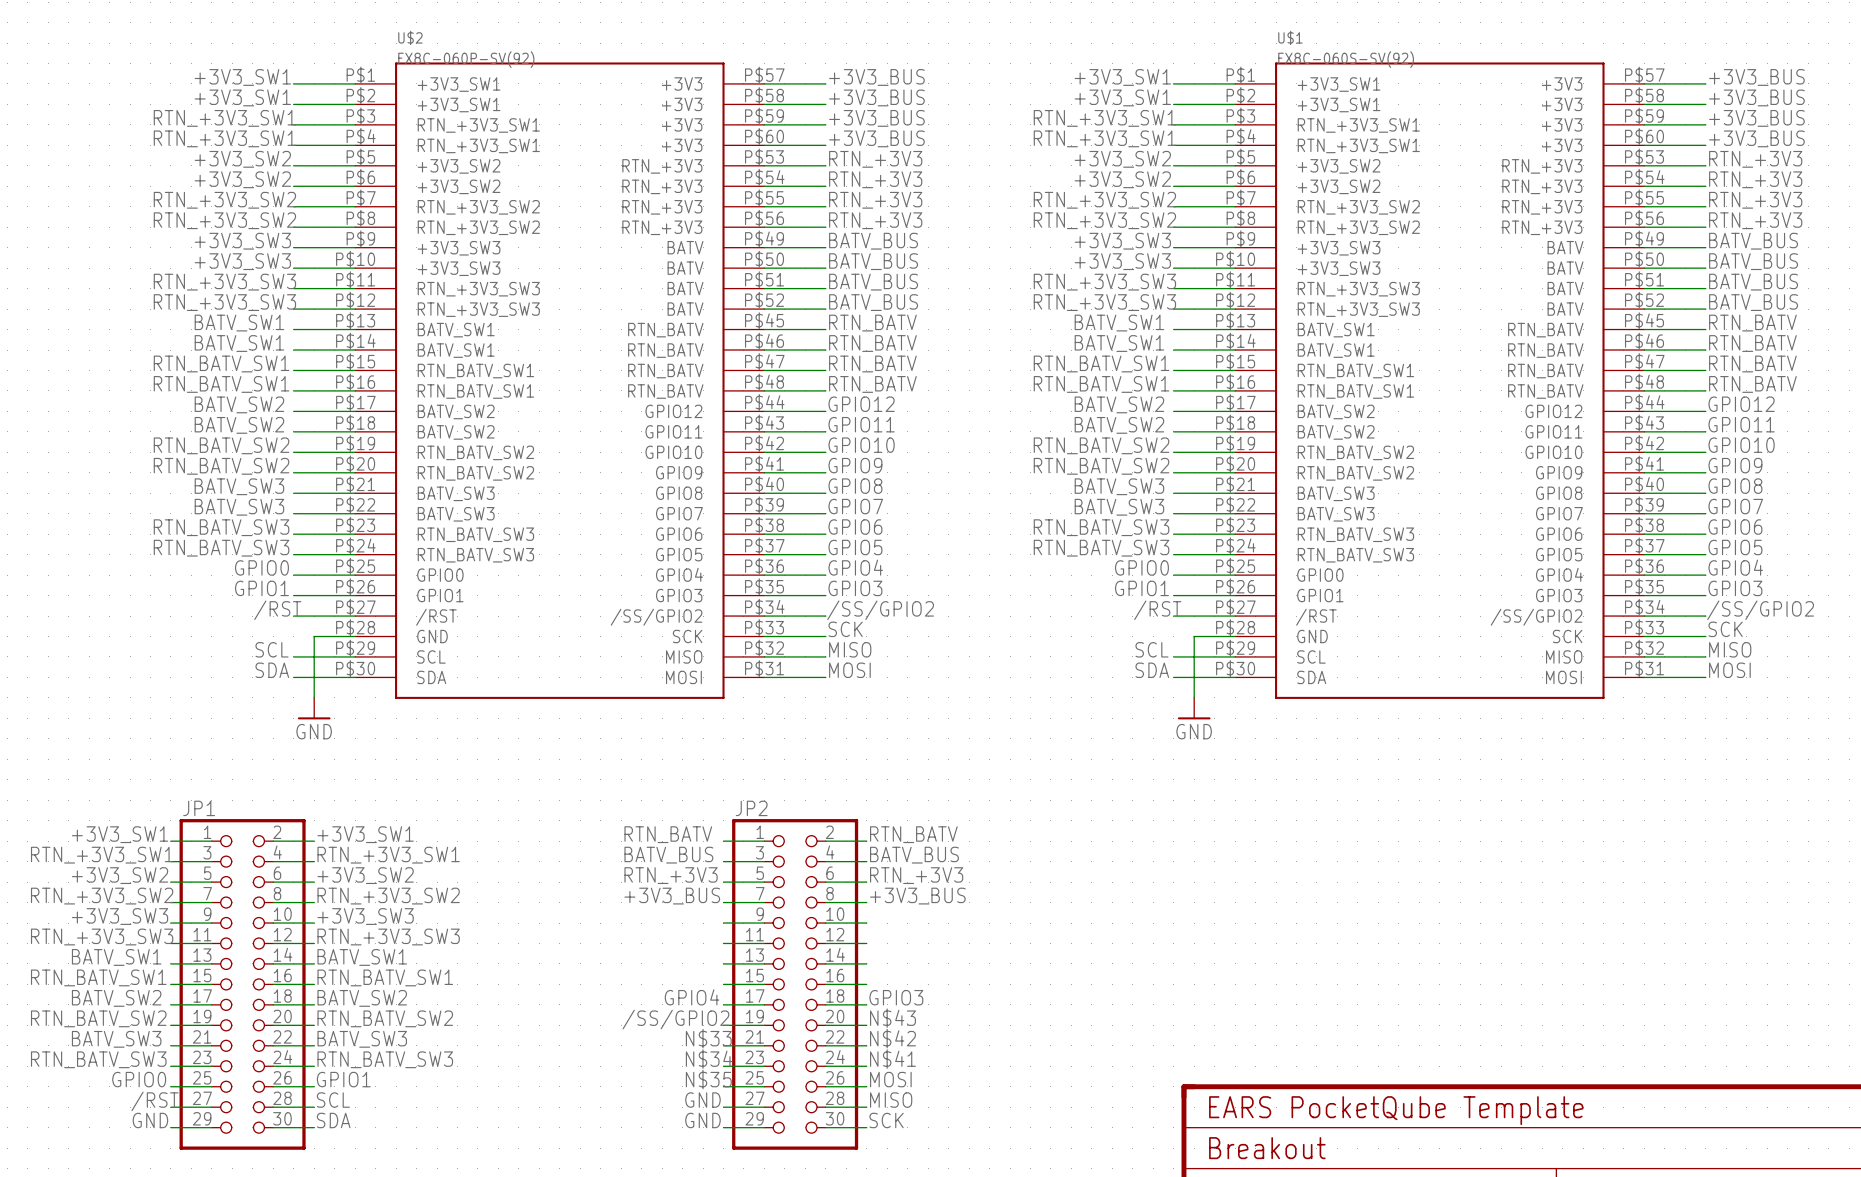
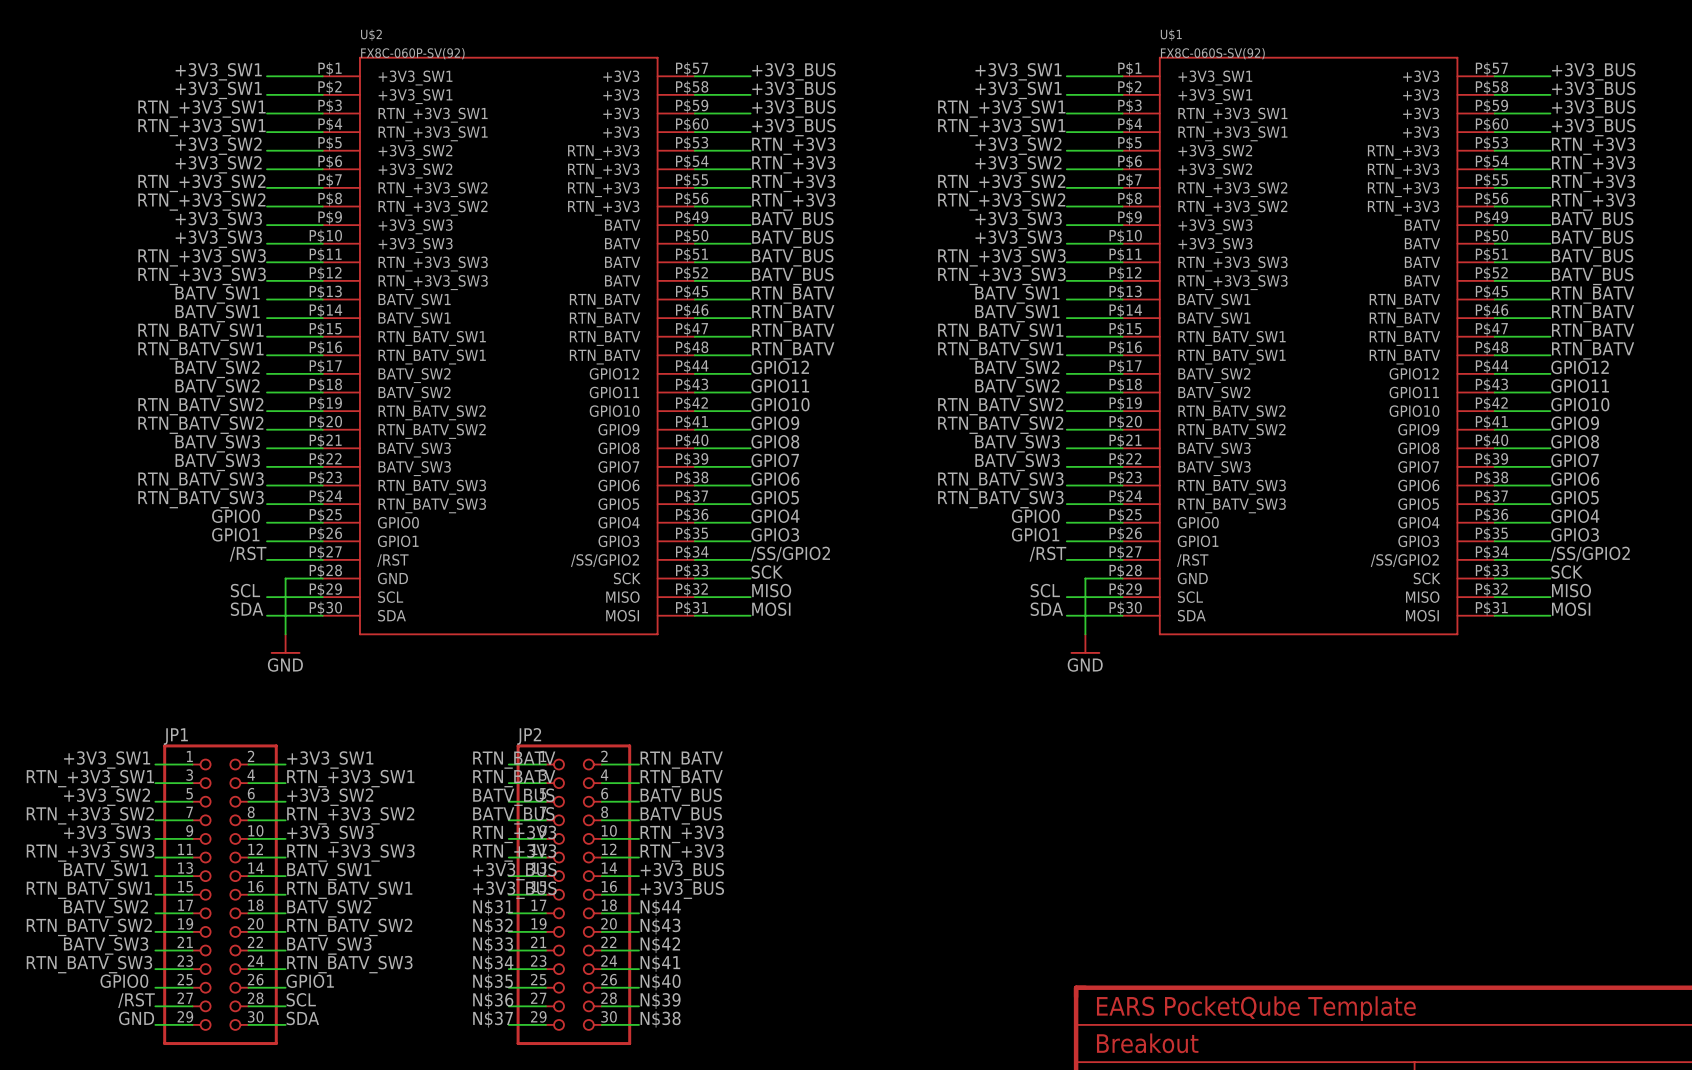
label: none -> RTN_BATV (514, 760)
label: RTN_BATV (668, 834) -> none
label: none -> RTN_BATV (681, 760)
label: RTN_BATV (913, 834) -> none
wire: (723, 841) (764, 841) -> (508, 764) (545, 764)
wire: (825, 841) (866, 841) -> (601, 764) (638, 764)
label: none -> RTN_BATV (514, 778)
label: BATV_BUS (668, 855) -> none
label: none -> RTN_BATV (681, 778)
label: BATV_BUS (914, 855) -> none
wire: (723, 861) (764, 861) -> (508, 783) (545, 783)
wire: (825, 861) (866, 861) -> (601, 783) (638, 783)
label: none -> BATV_BUS (513, 797)
label: RTN_+3V3 (671, 875) -> none
label: none -> BATV_BUS (681, 797)
label: RTN_+3V3 (916, 875) -> none
wire: (723, 882) (764, 882) -> (508, 801) (545, 801)
wire: (825, 882) (866, 882) -> (601, 801) (638, 801)
label: none -> BATV_BUS (513, 815)
label: +3V3_BUS (672, 896) -> none
label: none -> BATV_BUS (681, 815)
label: +3V3_BUS (917, 896) -> none
wire: (723, 902) (764, 902) -> (508, 820) (545, 820)
wire: (825, 902) (866, 902) -> (601, 820) (638, 820)
label: none -> RTN_+3V3 (514, 834)
label: none -> RTN_+3V3 (682, 834)
wire: (723, 923) (764, 923) -> (508, 838) (545, 838)
wire: (825, 923) (866, 923) -> (601, 838) (638, 838)
label: none -> RTN_+3V3 (514, 853)
label: none -> RTN_+3V3 (682, 853)
wire: (723, 943) (764, 943) -> (508, 857) (545, 857)
wire: (825, 943) (866, 943) -> (601, 857) (638, 857)
label: none -> +3V3_BUS (514, 871)
label: none -> +3V3_BUS (682, 871)
wire: (723, 963) (764, 963) -> (508, 876) (545, 876)
wire: (825, 963) (866, 963) -> (601, 876) (638, 876)
label: none -> +3V3_BUS (514, 890)
label: none -> +3V3_BUS (682, 890)
wire: (723, 984) (764, 984) -> (508, 894) (545, 894)
JP2 position: (795, 984) -> (573, 894)
wire: (825, 984) (866, 984) -> (601, 894) (638, 894)
label: none -> N$31 (492, 907)
label: GPIO4 (692, 997) -> none
label: none -> N$44 (660, 907)
label: GPIO3 (896, 997) -> none
wire: (723, 1004) (764, 1004) -> (508, 913) (545, 913)
wire: (825, 1004) (866, 1004) -> (601, 913) (638, 913)
label: none -> N$32 (492, 926)
label position: N$43 (892, 1018) -> N$43 (660, 926)
label: /SS/GPIO2 (675, 1019) -> none
wire: (723, 1025) (764, 1025) -> (508, 931) (545, 931)
wire: (825, 1025) (866, 1025) -> (601, 931) (638, 931)
label position: N$33 (708, 1038) -> N$33 (493, 945)
label position: N$42 (892, 1038) -> N$42 (660, 945)
wire: (723, 1045) (764, 1045) -> (508, 950) (545, 950)
wire: (825, 1045) (866, 1045) -> (601, 950) (638, 950)
label position: N$34 (709, 1059) -> N$34 (493, 963)
label position: N$41 (892, 1059) -> N$41 (660, 963)
wire: (723, 1066) (764, 1066) -> (508, 969) (545, 969)
wire: (825, 1066) (866, 1066) -> (601, 969) (638, 969)
label position: N$35 (708, 1079) -> N$35 (493, 982)
label: none -> N$40 (660, 982)
label: MOSI (890, 1079) -> none
wire: (723, 1086) (764, 1086) -> (508, 987) (545, 987)
wire: (825, 1086) (866, 1086) -> (601, 987) (638, 987)
label: none -> N$36 (493, 1000)
label: GND (702, 1100) -> none
label: none -> N$39 (660, 1000)
label: MISO (891, 1100) -> none
wire: (723, 1107) (764, 1107) -> (508, 1006) (545, 1006)
wire: (825, 1107) (866, 1107) -> (601, 1006) (638, 1006)
label: none -> N$37 (493, 1019)
label: GND (702, 1120) -> none
label: none -> N$38 (660, 1019)
label: SCK (886, 1120) -> none
wire: (723, 1127) (764, 1127) -> (508, 1024) (545, 1024)
wire: (825, 1127) (866, 1127) -> (601, 1024) (638, 1024)

